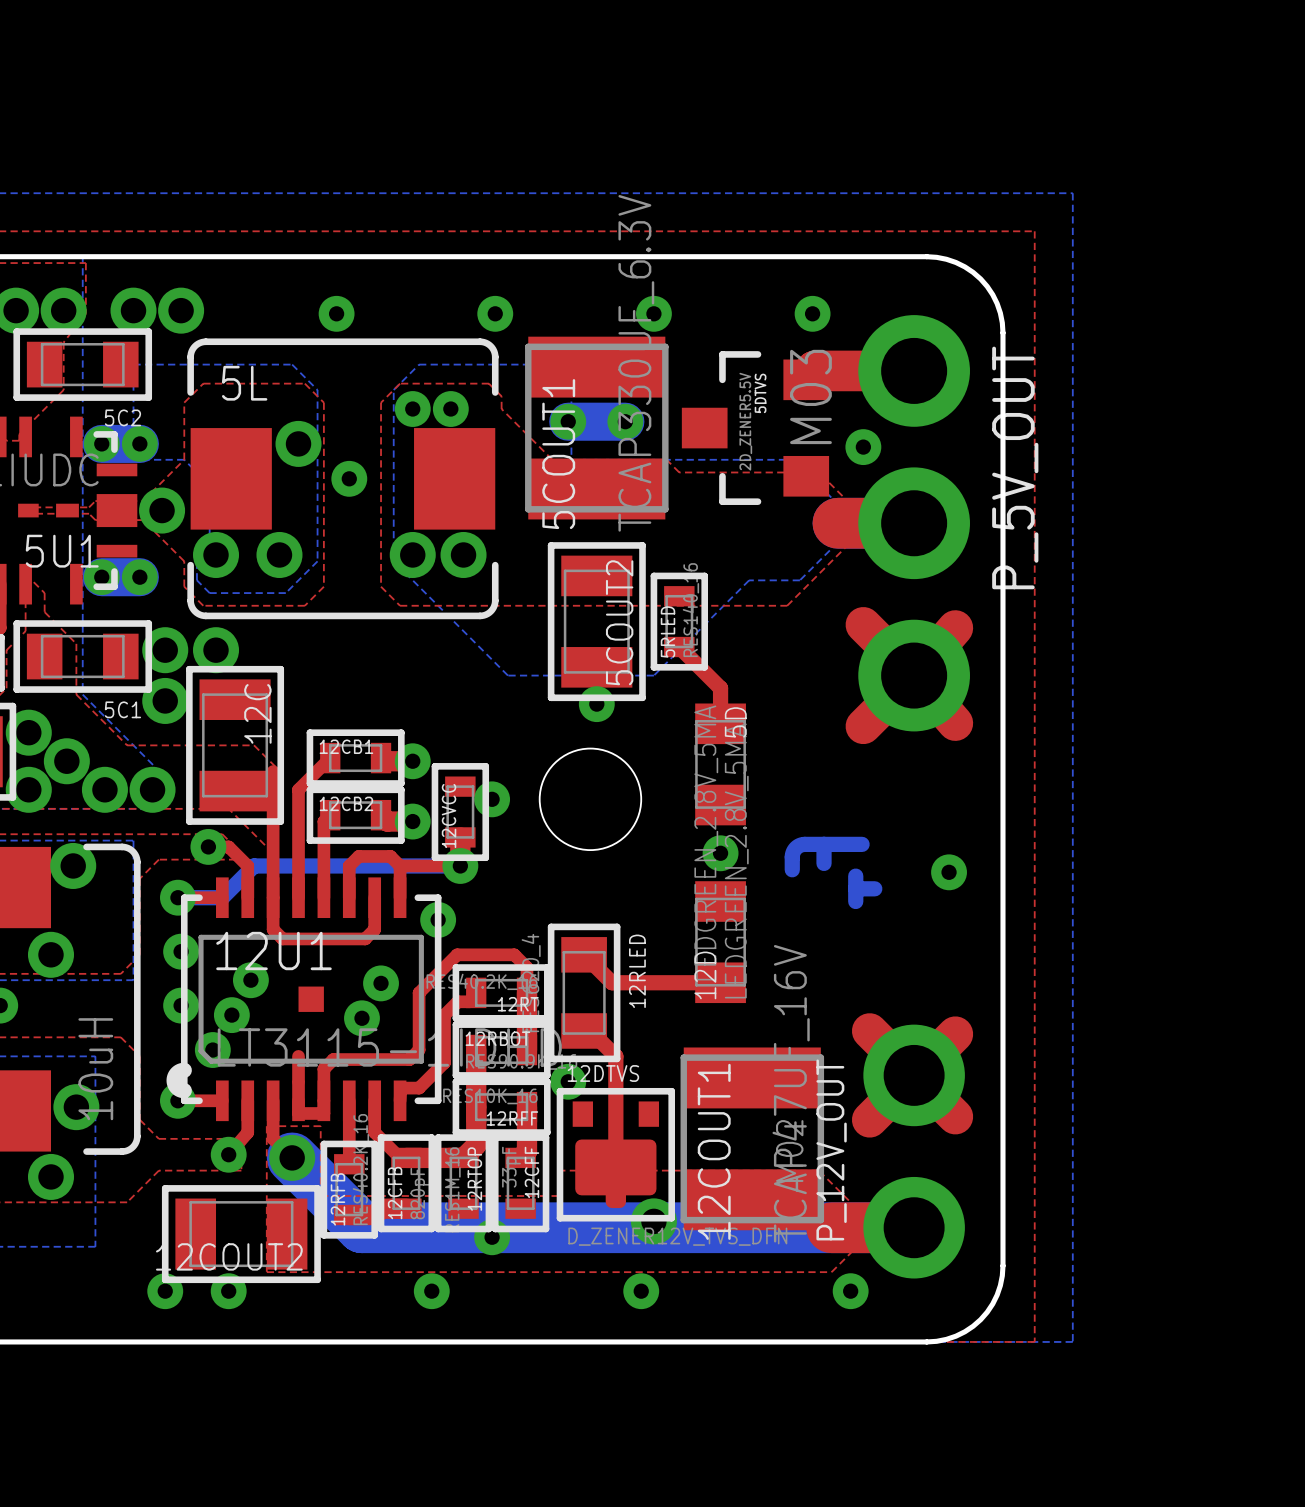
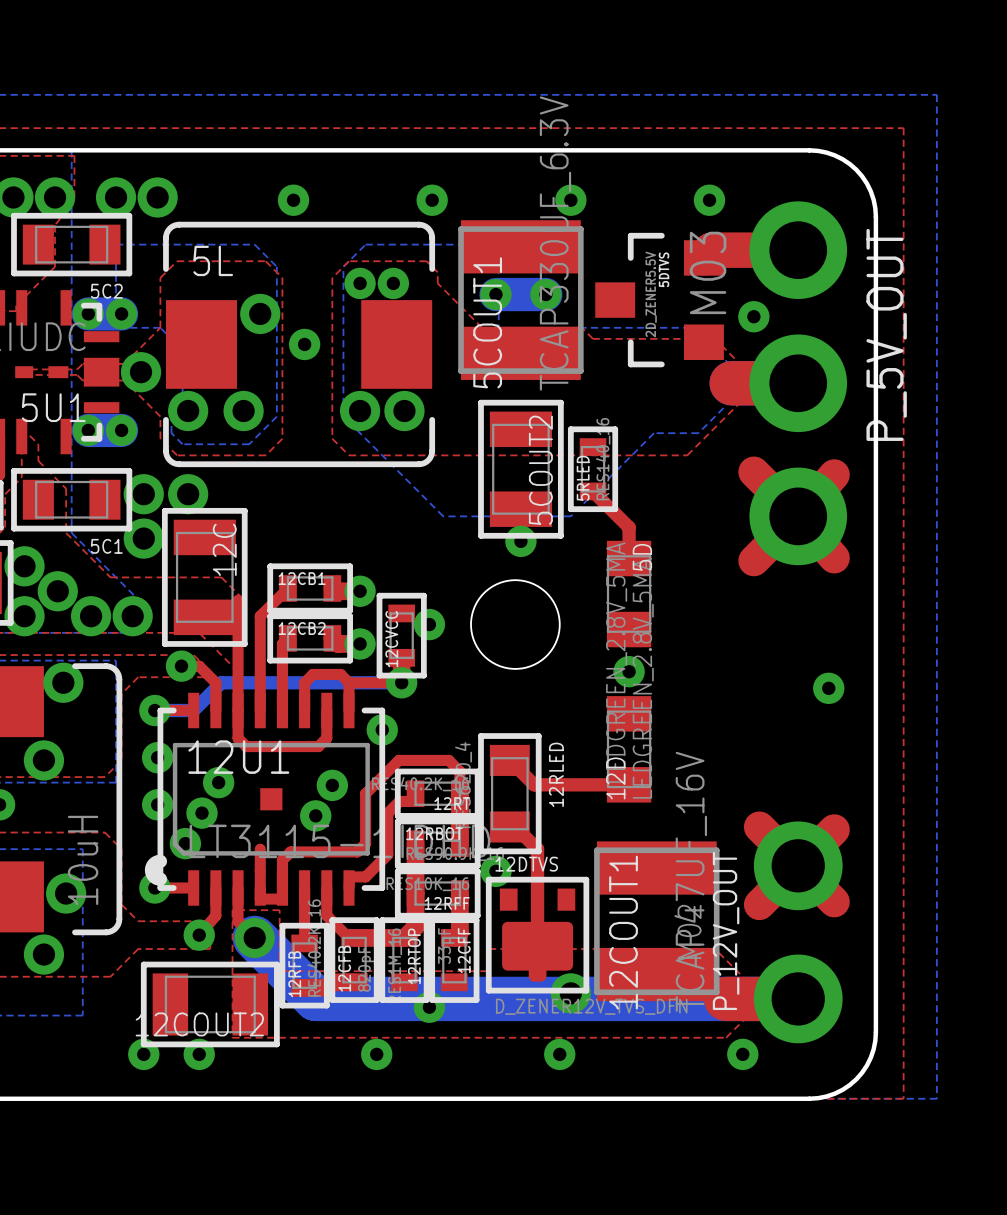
drawing: [784, 836, 883, 910] -> none

